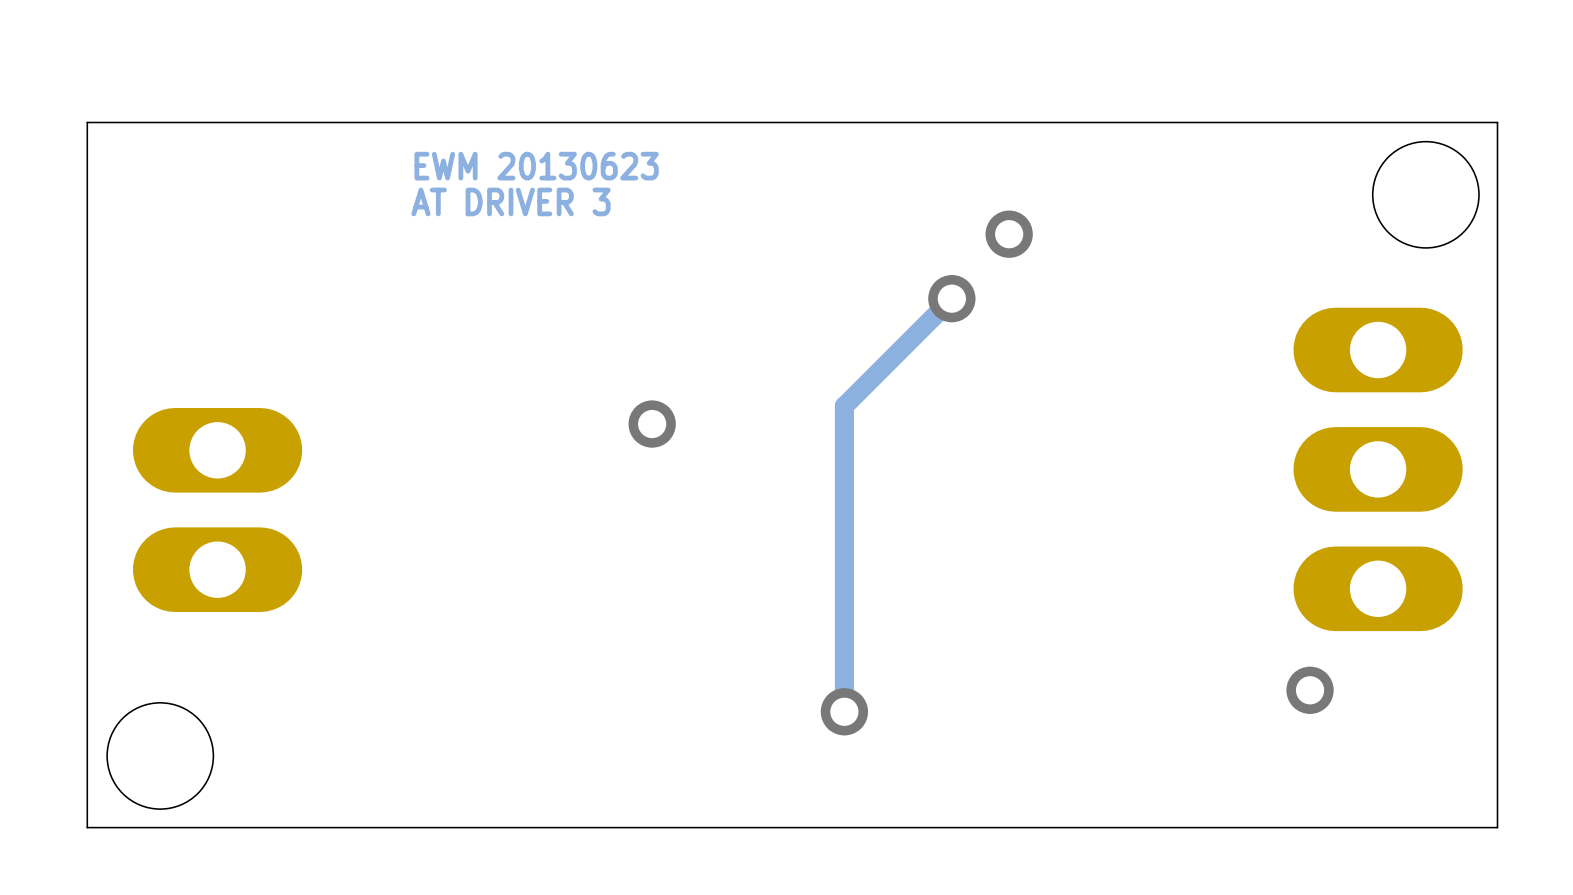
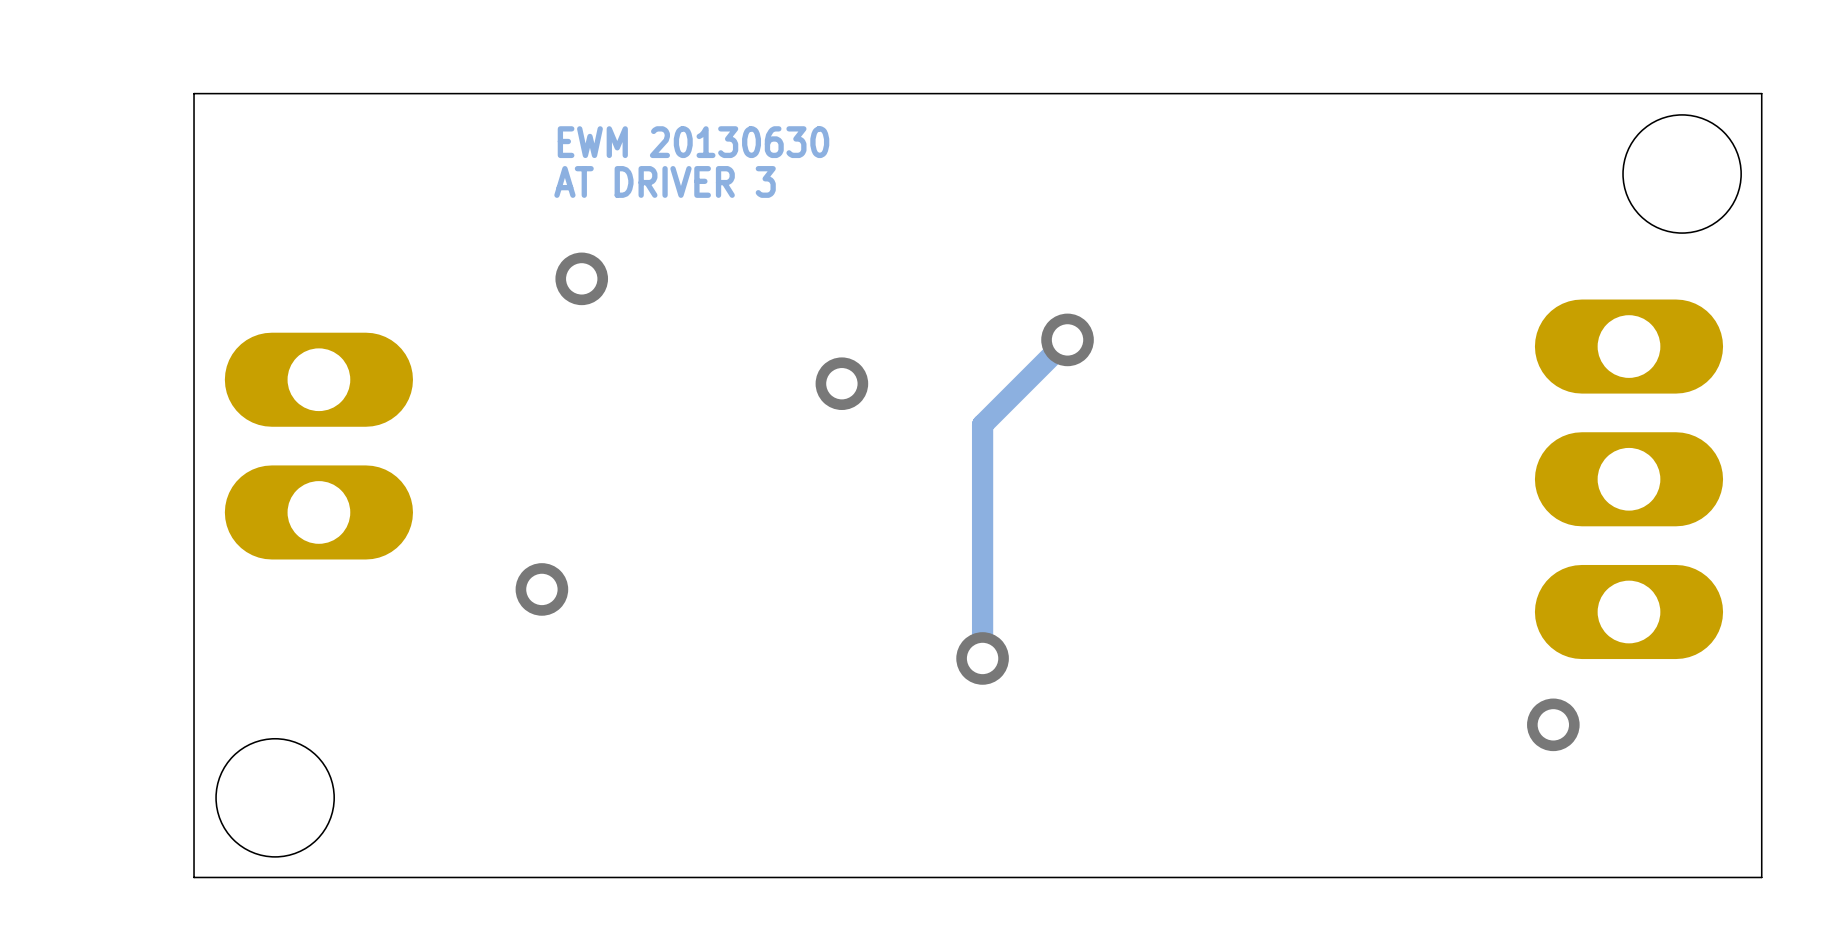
text: EWM 20130623 (536, 166) -> EWM 20130630 (693, 142)
via: (1009, 234) -> none
via: none -> (581, 278)
track: (951, 298) (844, 406) (844, 711) -> none
via: (951, 298) -> none
track: none -> (1067, 339) (982, 424) (982, 658)
via: none -> (1067, 339)
via position: (652, 424) -> (841, 383)
part position: (217, 510) -> (318, 446)
via: none -> (541, 589)
via position: (844, 711) -> (982, 658)

